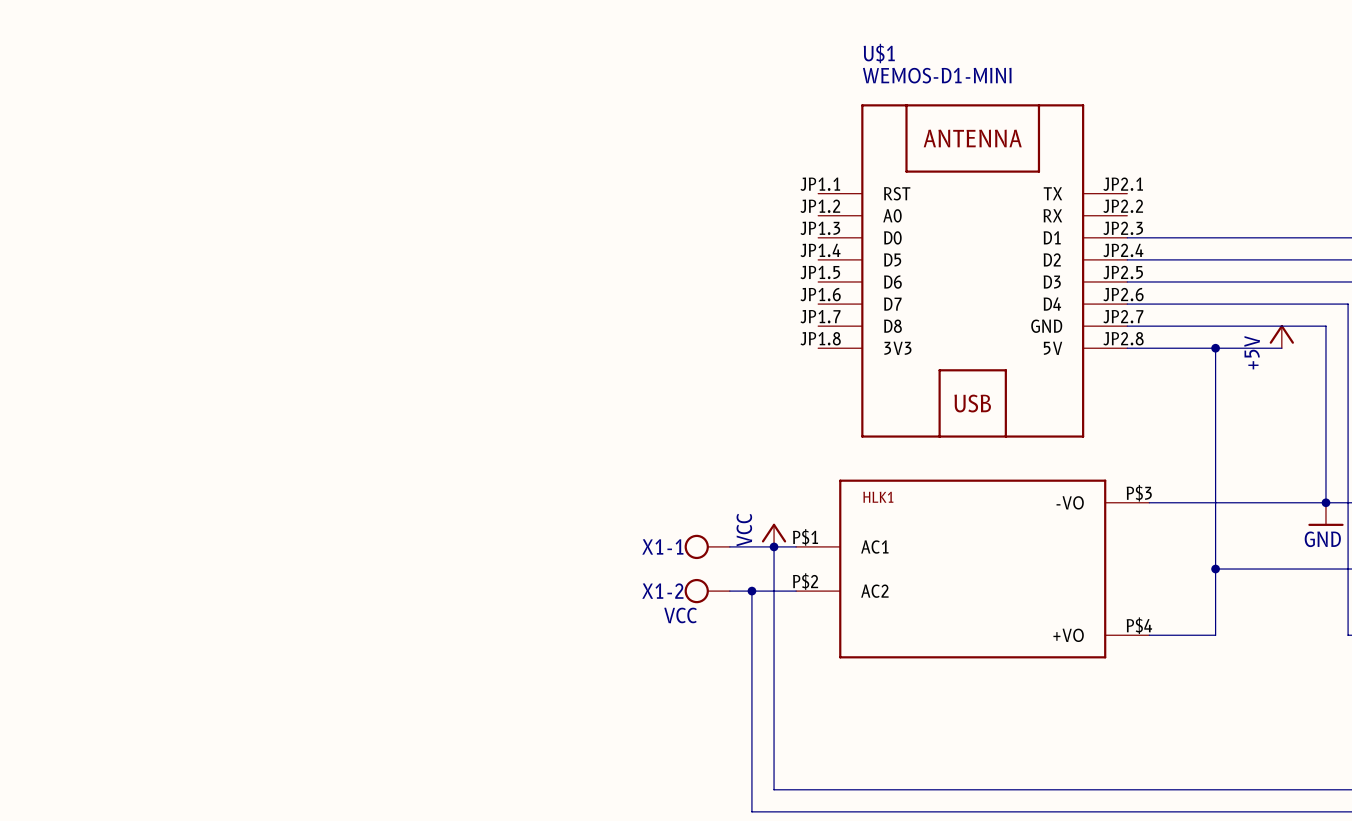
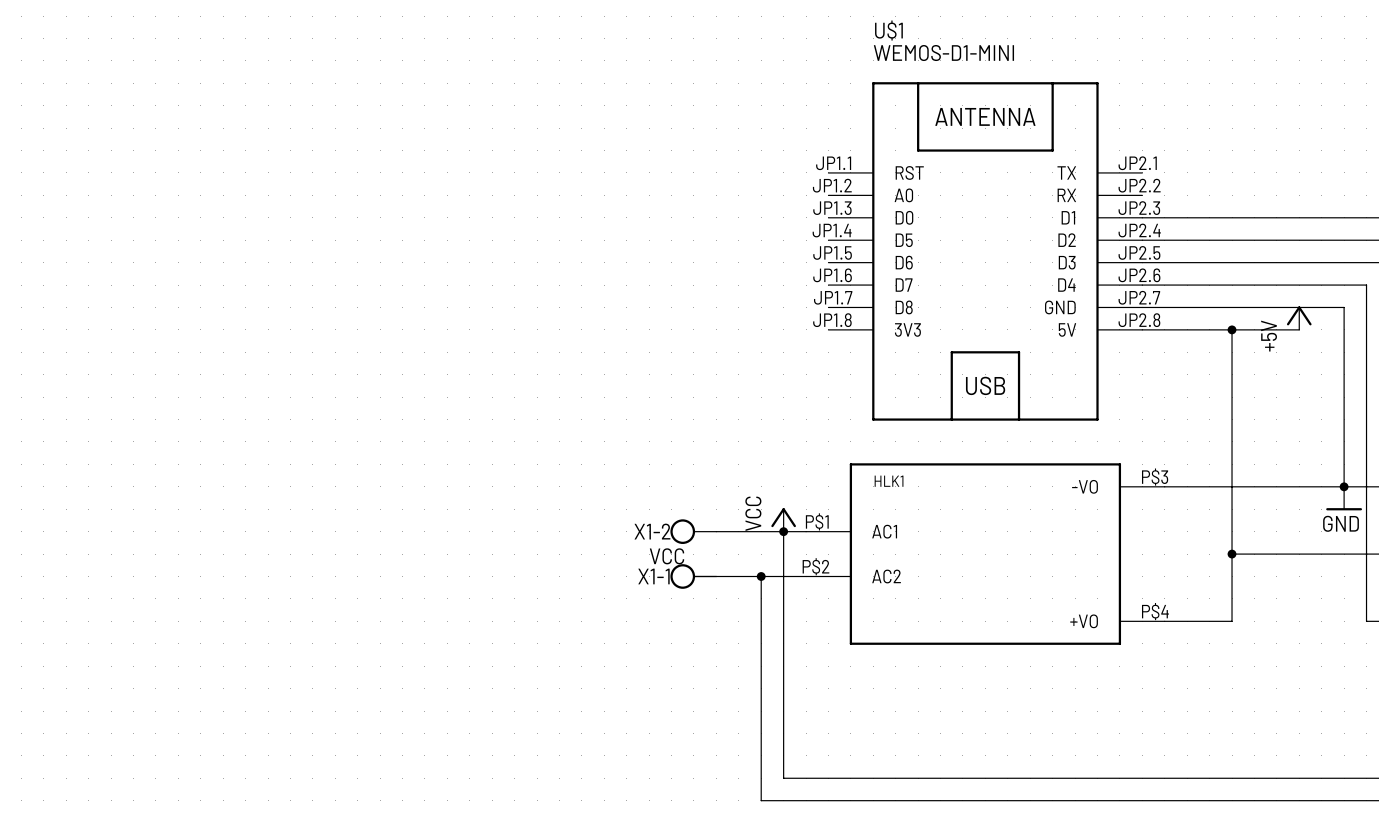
X1-1 position: (707, 546) -> (693, 576)
X1-2 position: (707, 591) -> (693, 531)

